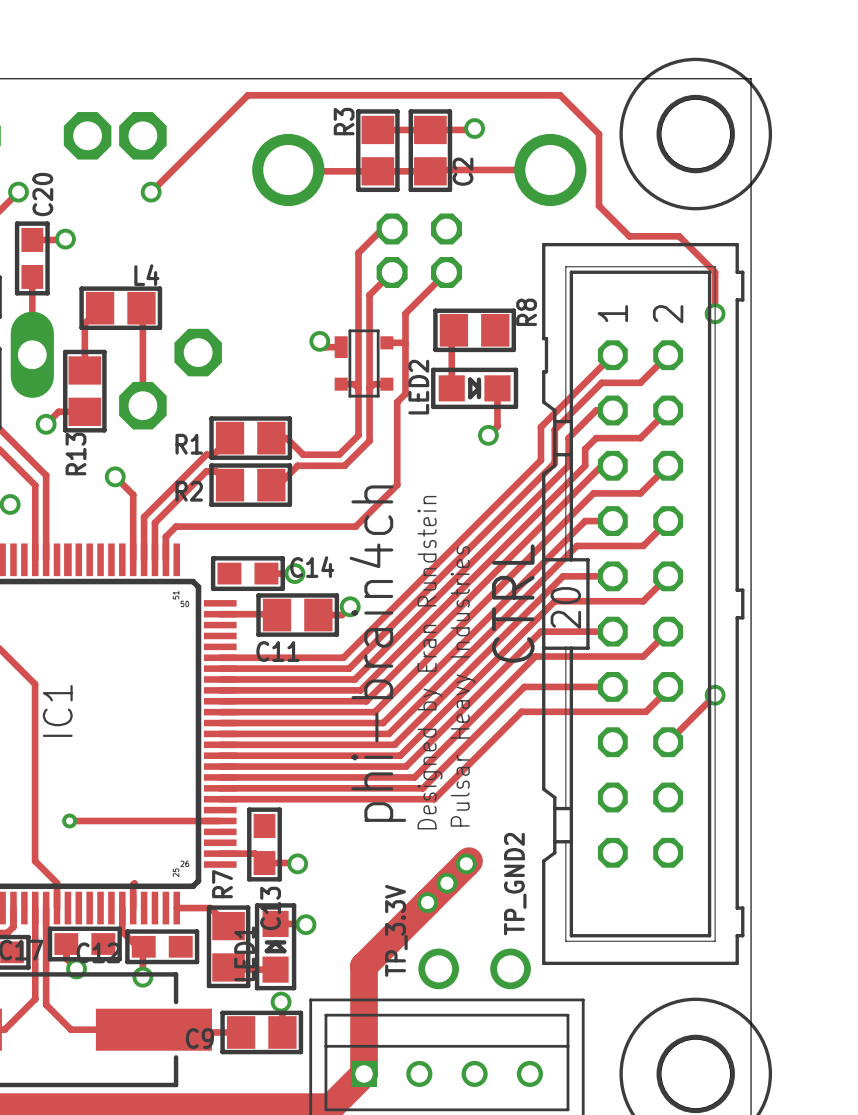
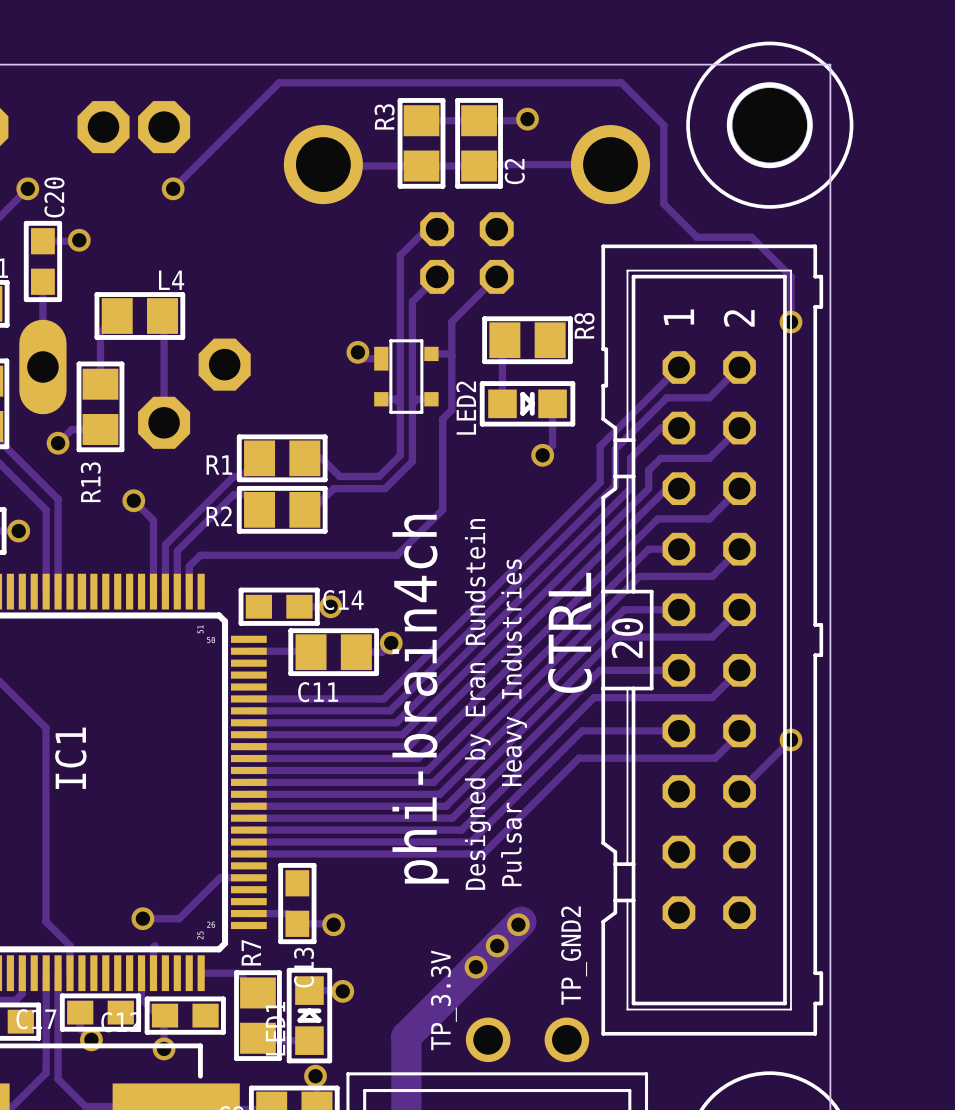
track: (69, 820) (194, 820) -> (142, 918) (179, 918) (220, 877)
via: (69, 820) -> none
via: none -> (142, 918)

